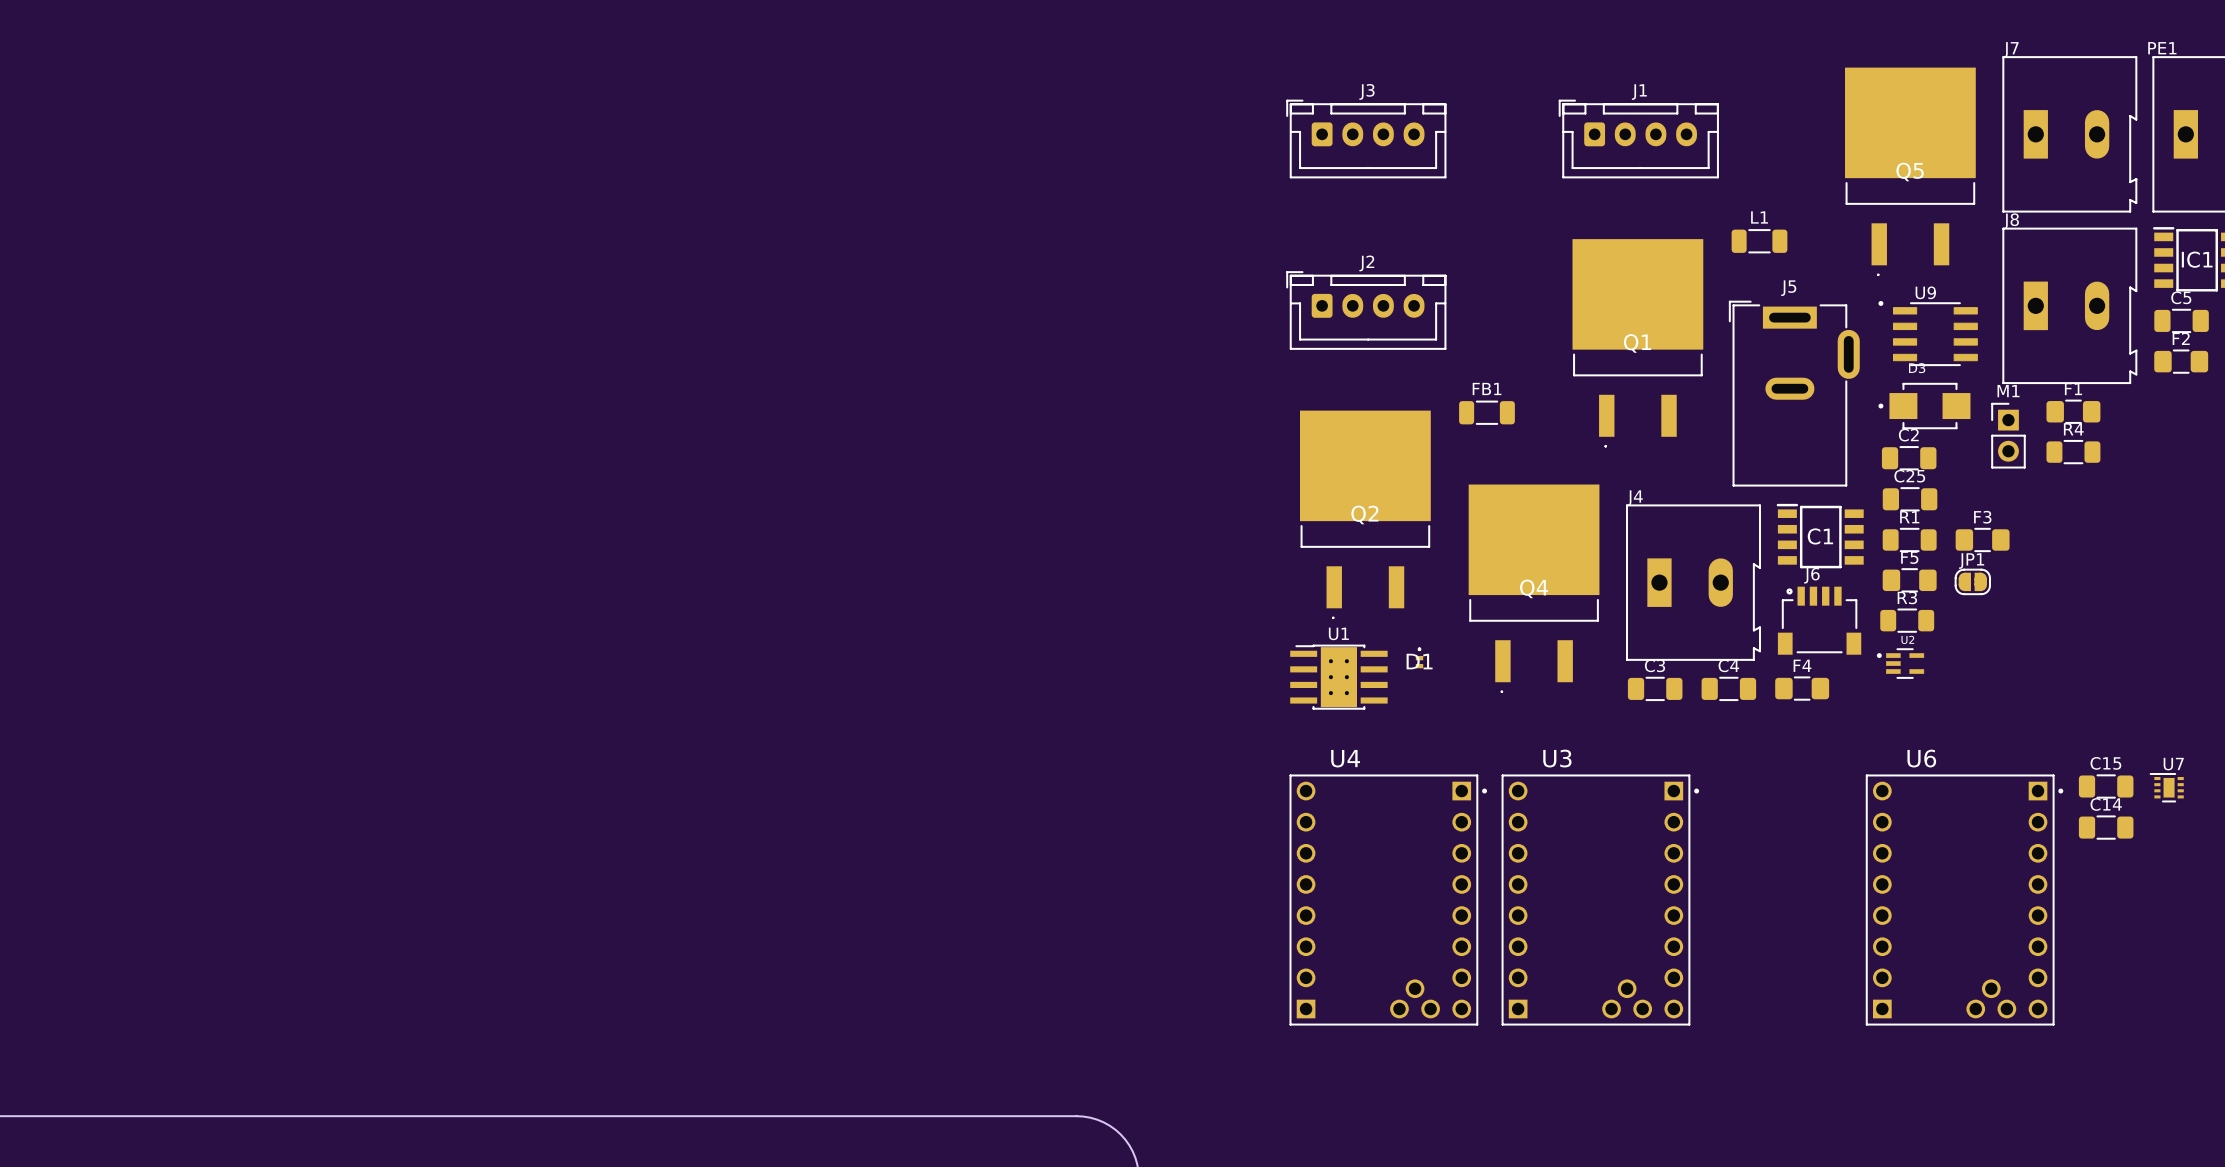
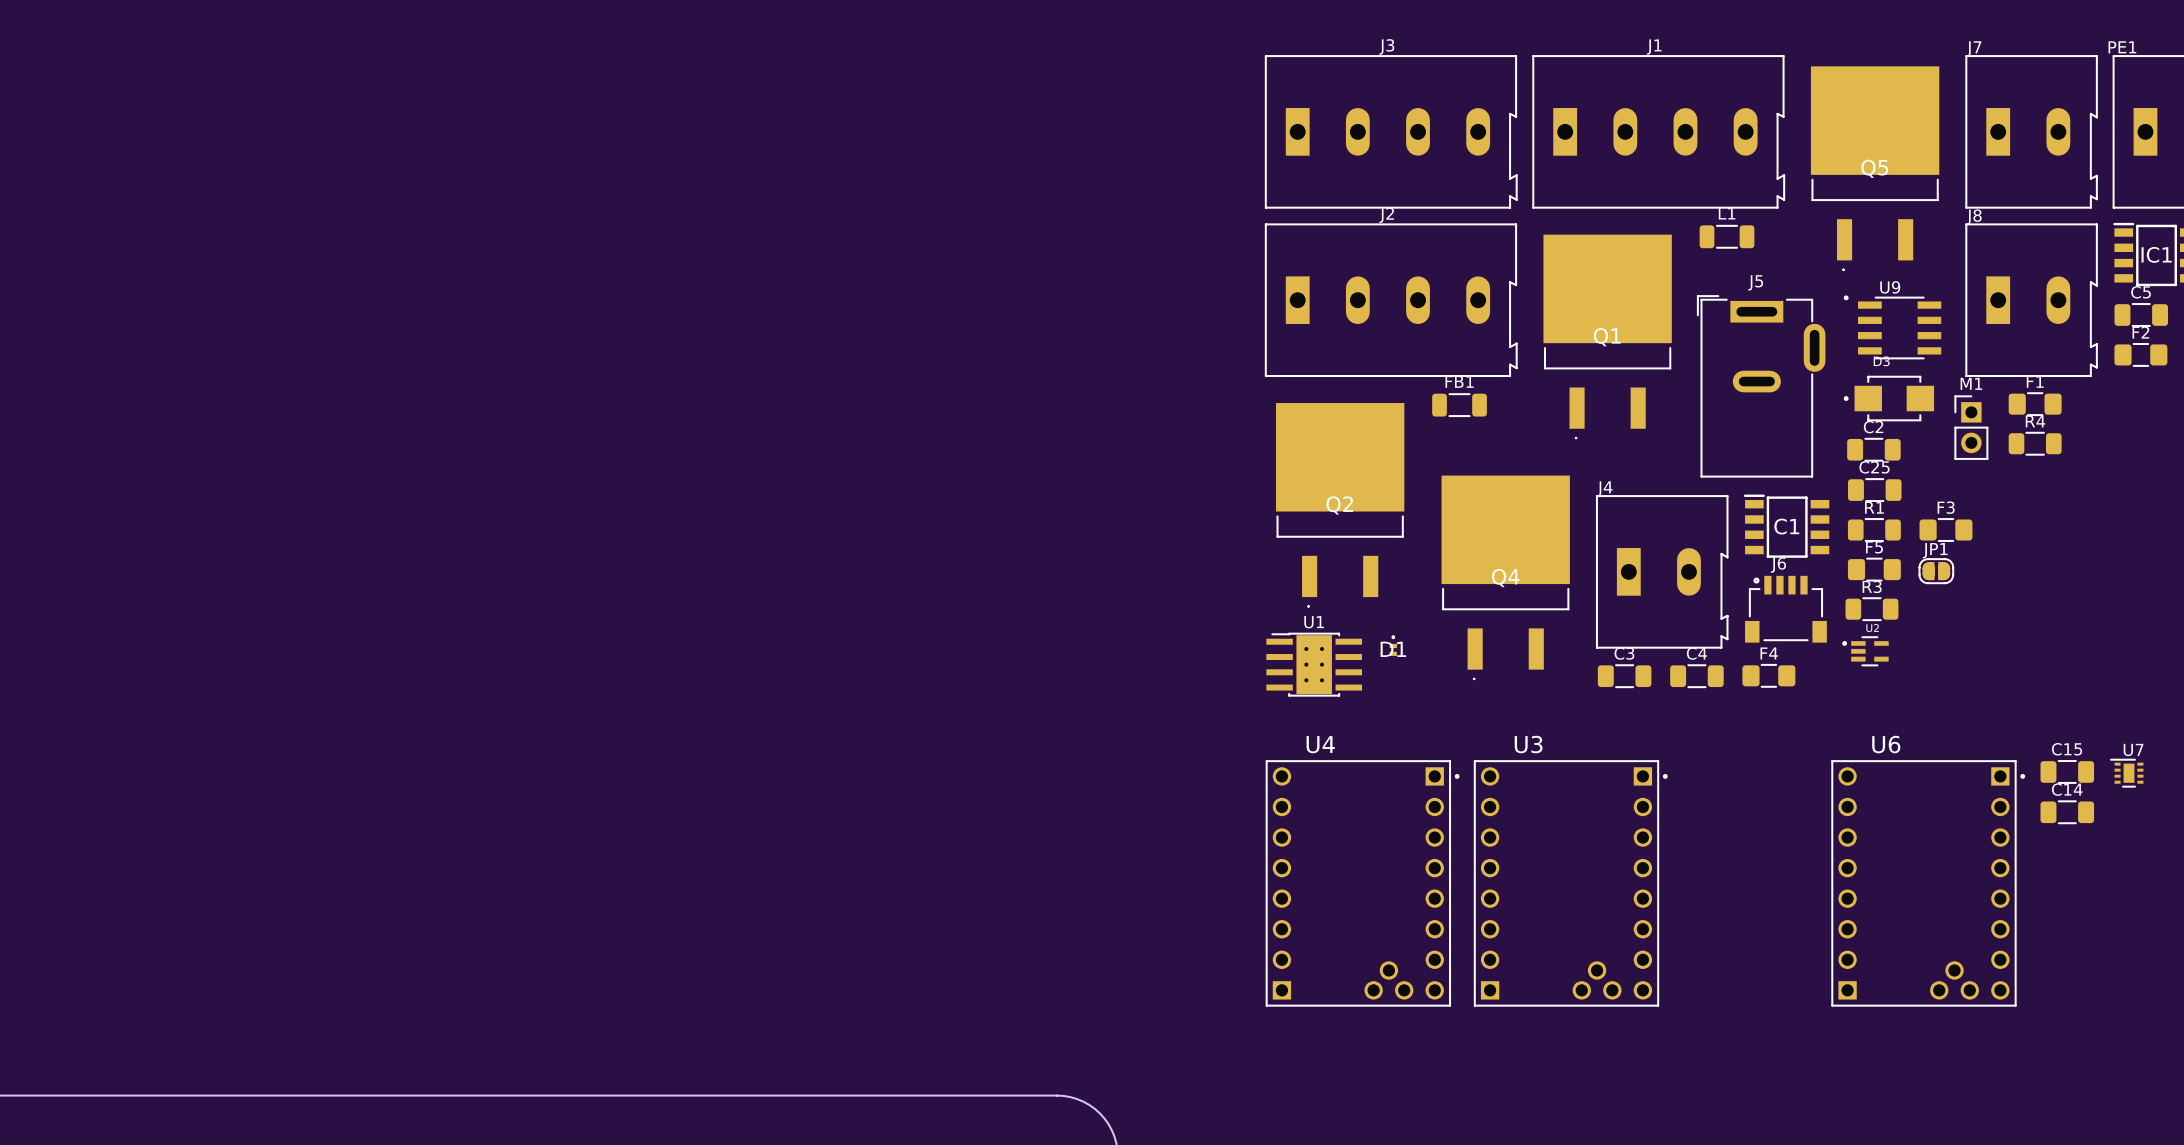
J3 name position: J3 (1366, 91) -> J3 (1386, 46)
J1 name position: J1 (1639, 92) -> J1 (1654, 47)
J3 footprint: [1286, 99, 1447, 179] -> [1265, 55, 1518, 209]
J1 footprint: [1558, 99, 1719, 179] -> [1532, 55, 1785, 209]
J2 name position: J2 (1366, 263) -> J2 (1386, 215)
J2 footprint: [1286, 271, 1447, 350] -> [1265, 223, 1518, 377]

